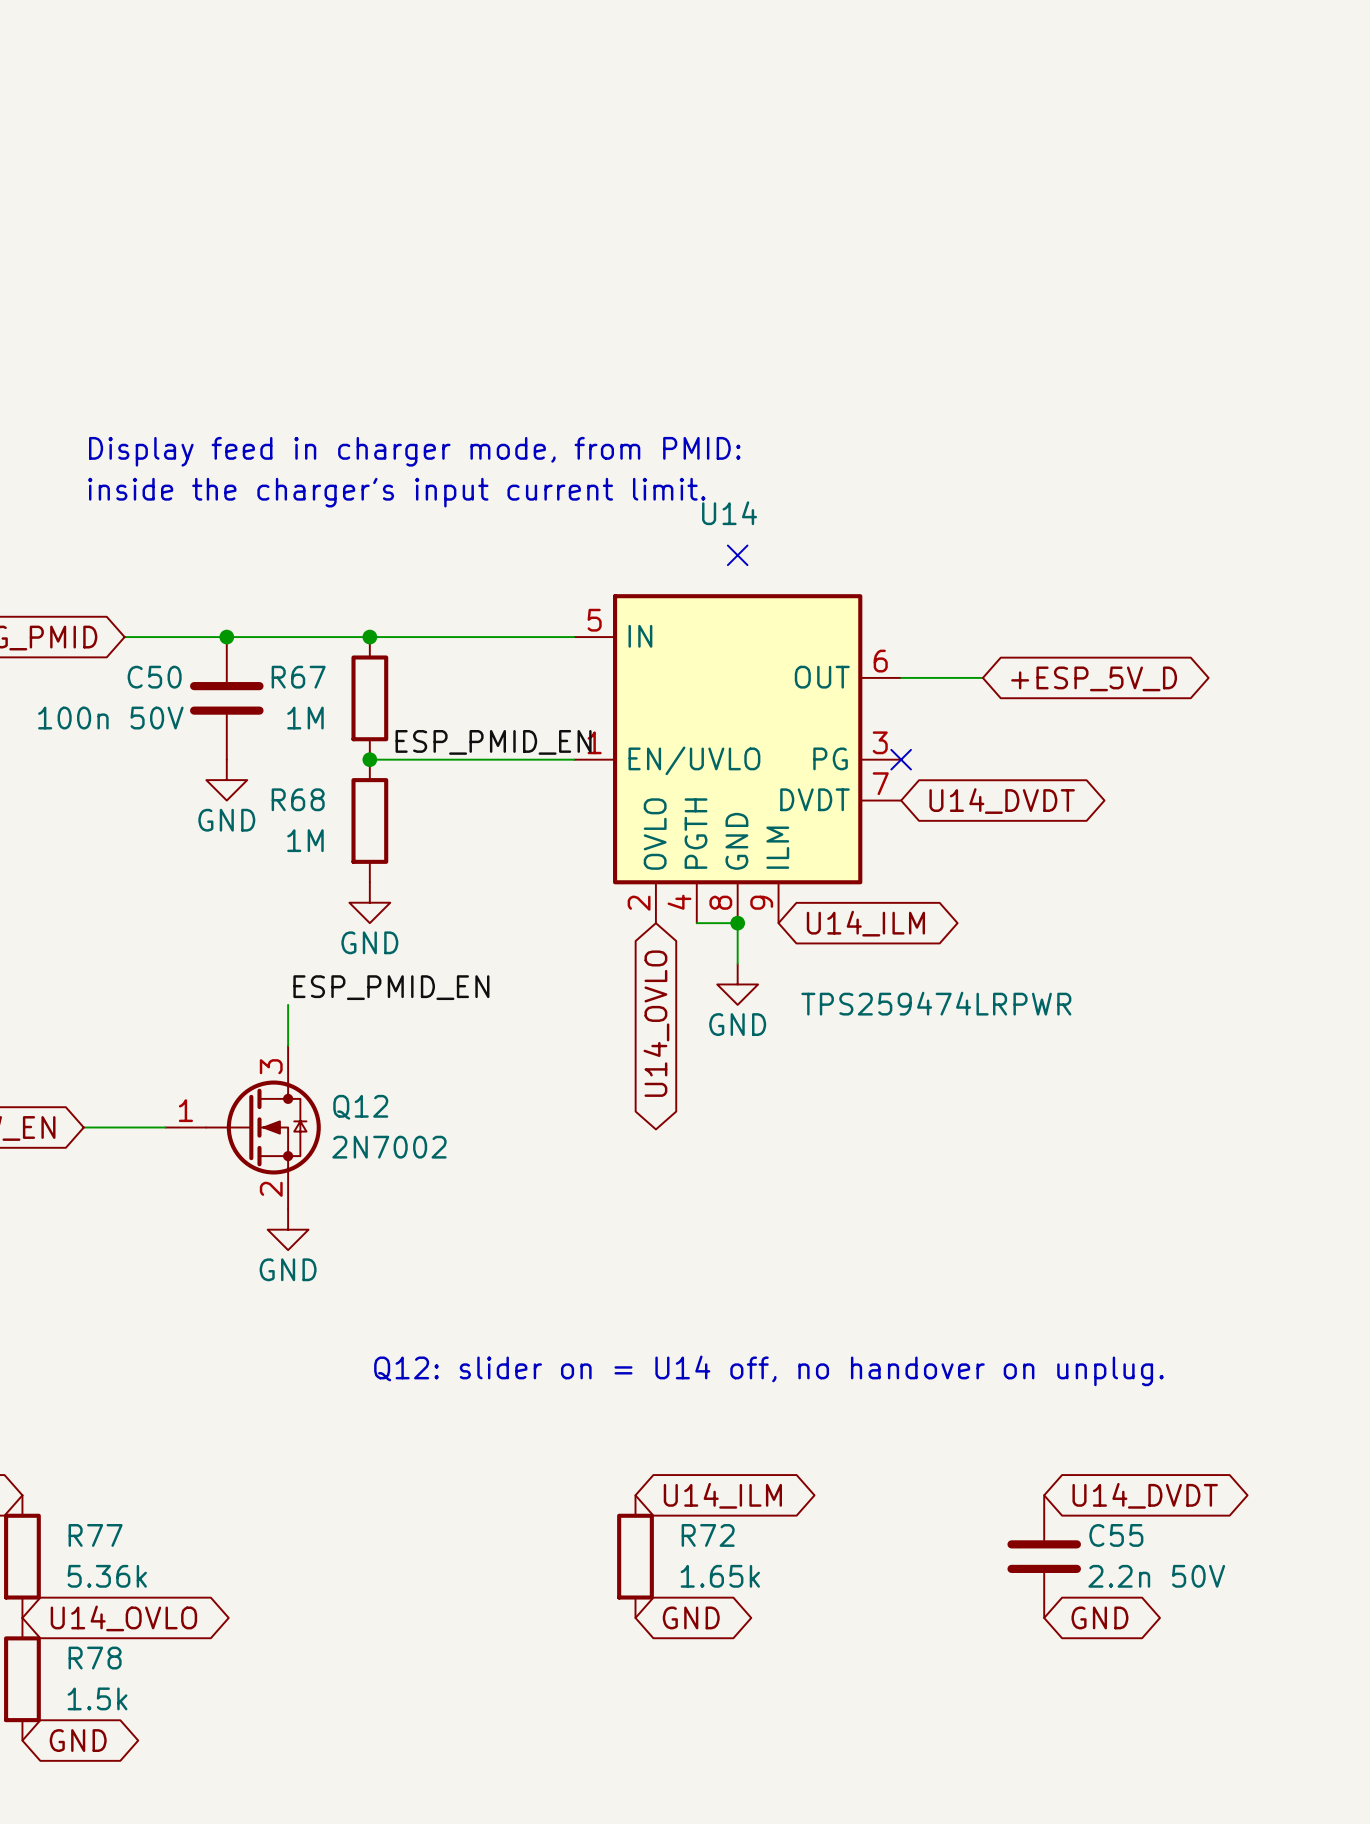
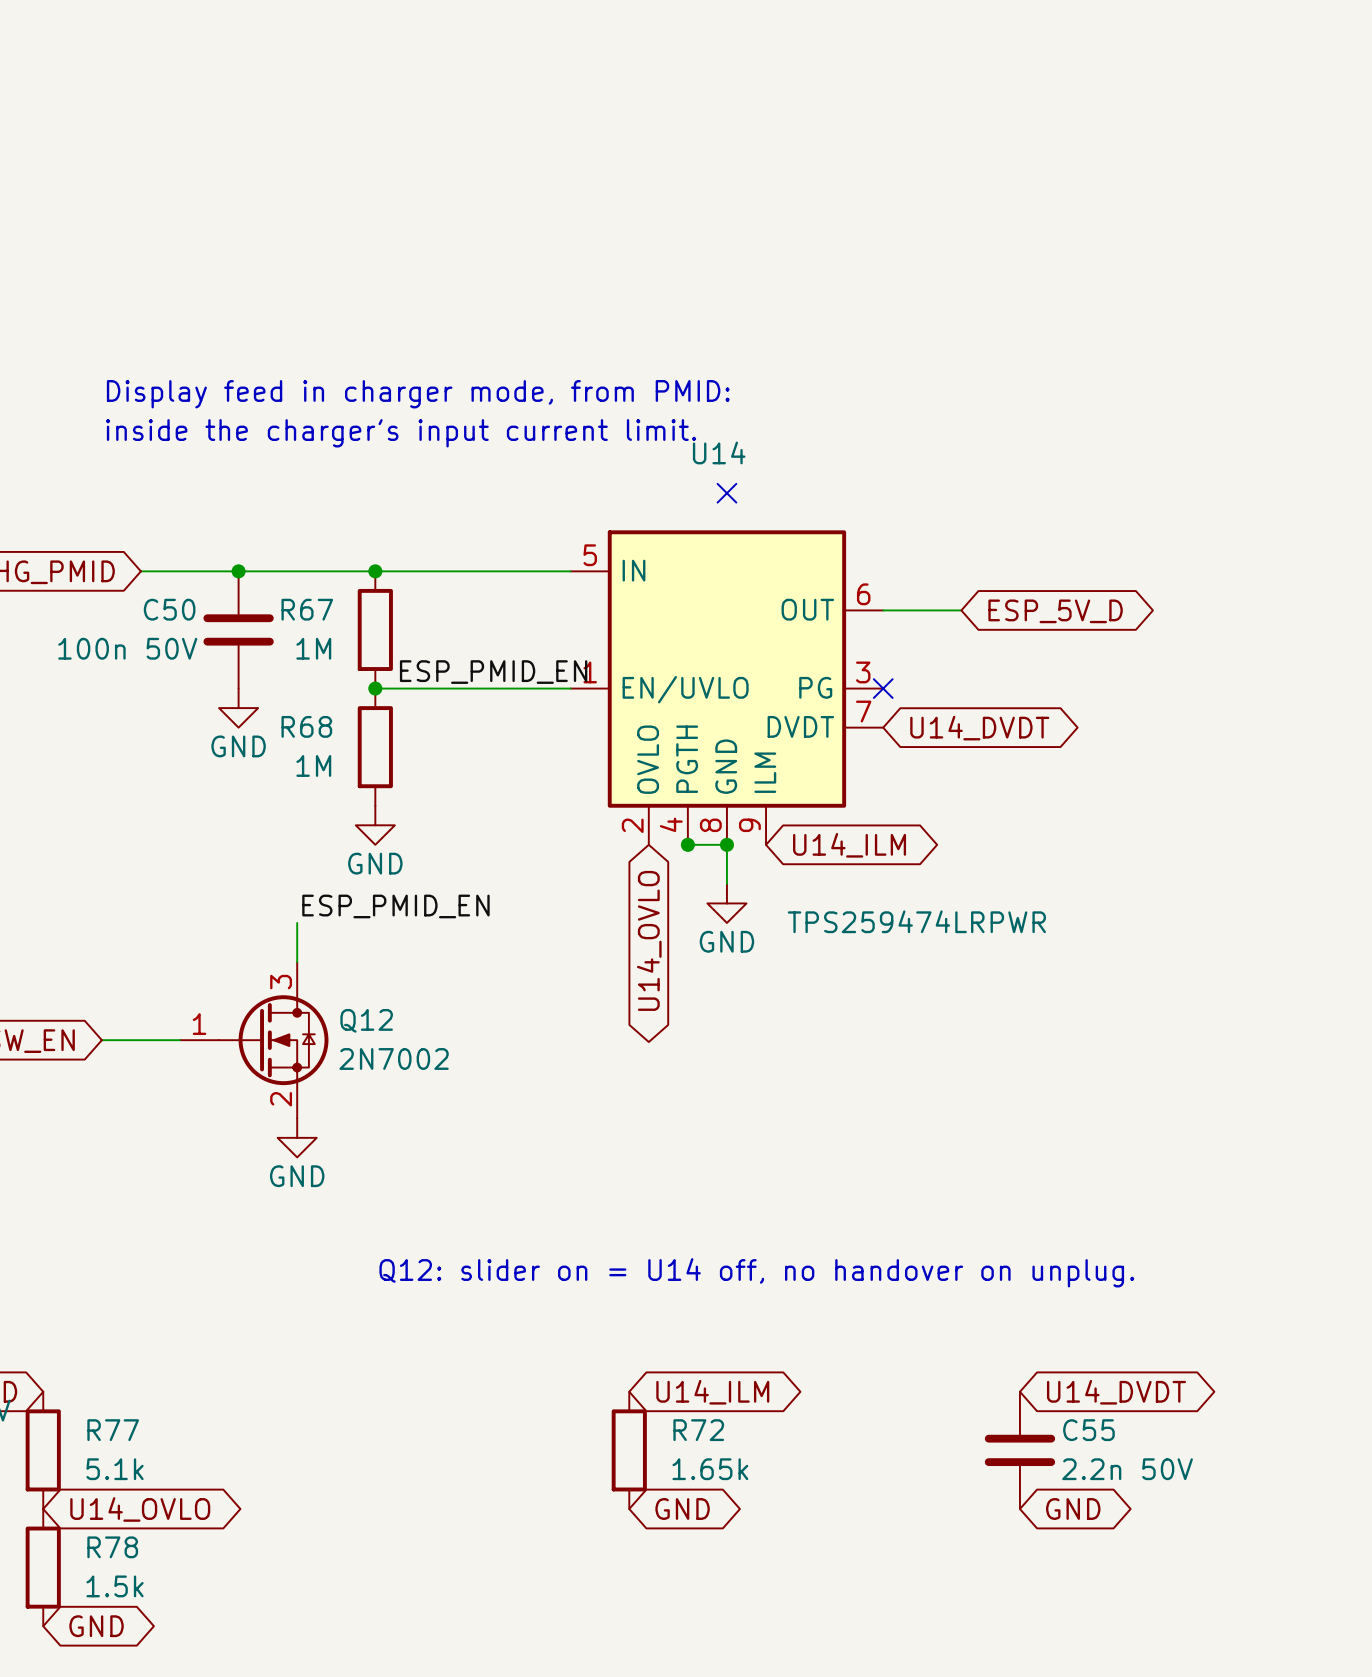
global label: +ESP_5V_D (1094, 678) -> ESP_5V_D (1055, 611)
junction: none -> (687, 844)
R77 value: 5.36k (107, 1576) -> 5.1k (115, 1469)

